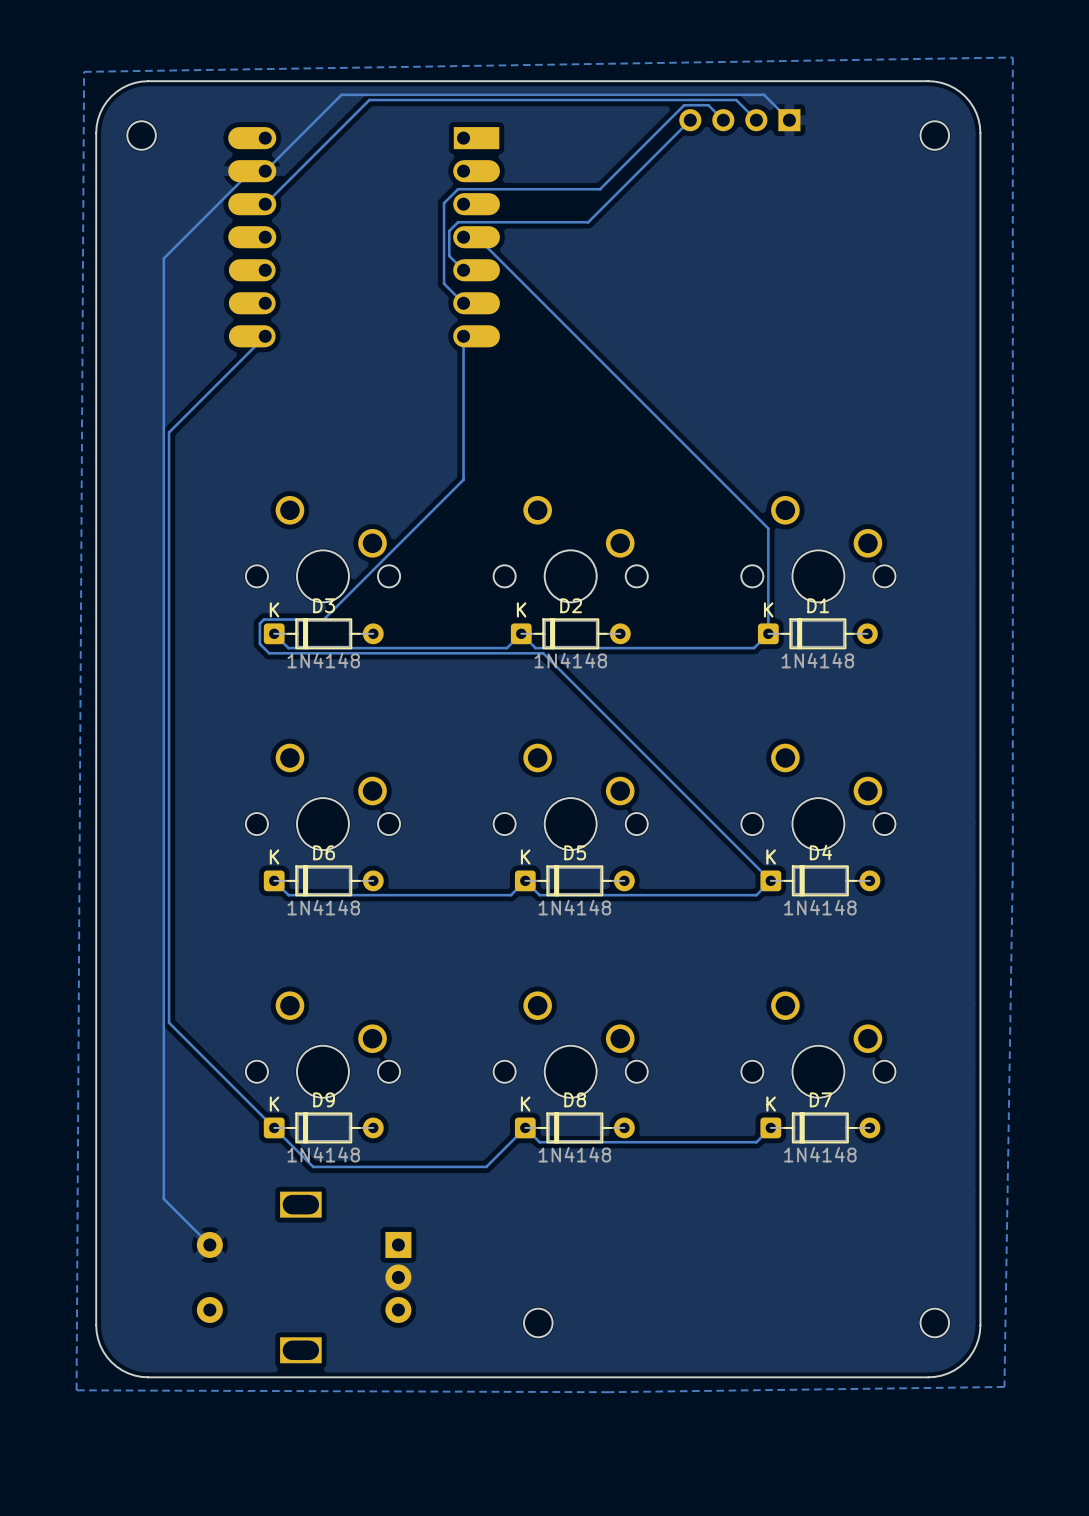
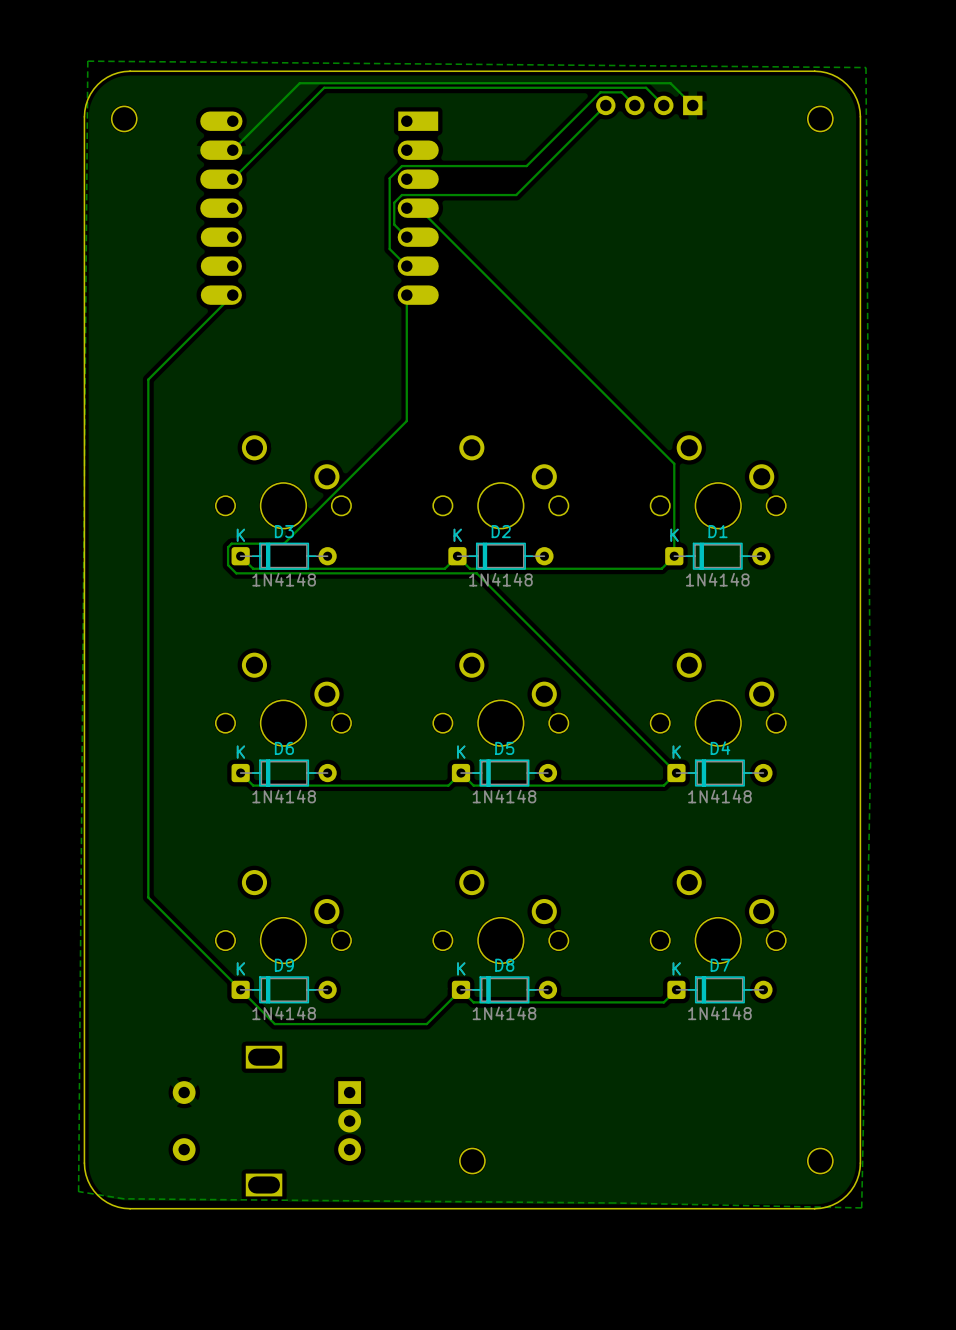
zone outline: (1012, 57) (84, 71) (76, 1390) (608, 1392) (1004, 1386) (1012, 868) (1012, 57) -> (87, 61) (865, 67) (870, 762) (861, 1207) (614, 1203) (123, 1198) (78, 1191) (87, 61)
track: (265, 171) (251, 171) (163, 258) (163, 1198) (209, 1244) -> none

